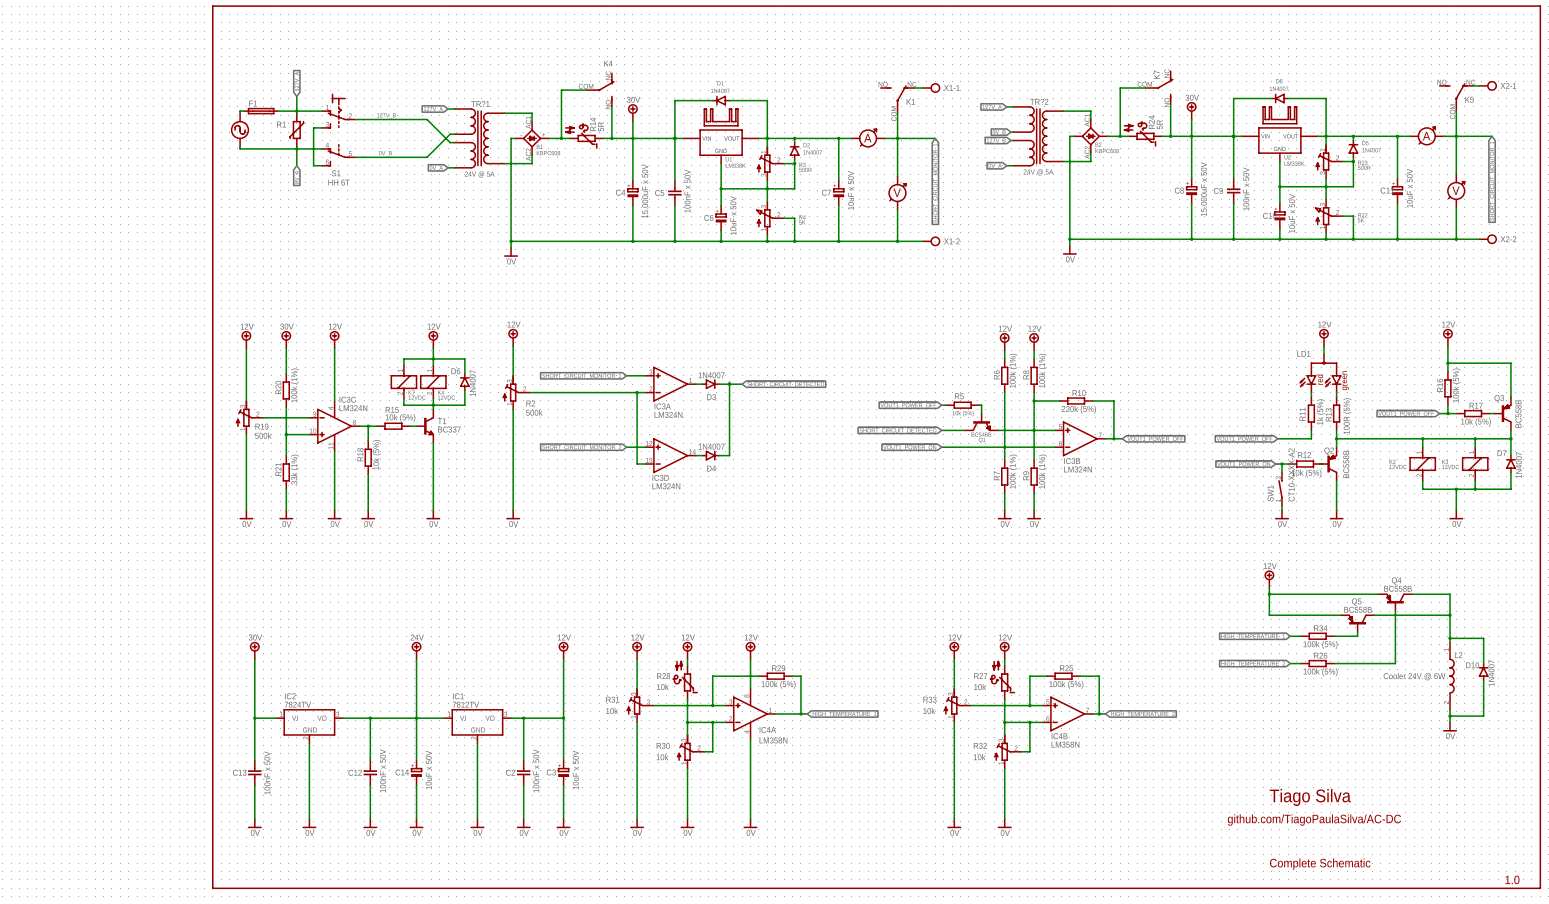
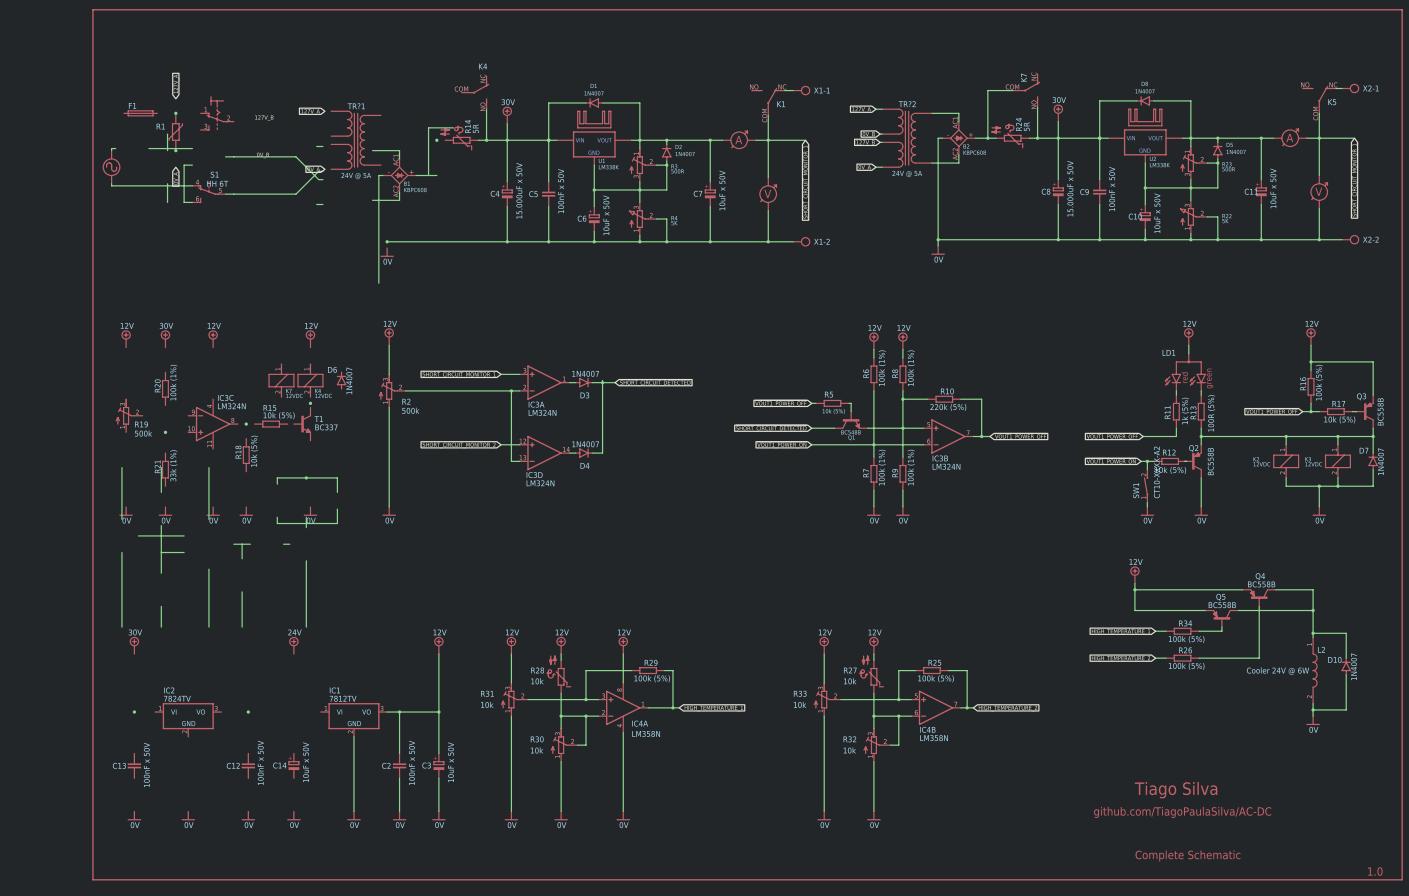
wire: (586, 90) (561, 90) (561, 138) -> (453, 127) (428, 127) (428, 175)
wire: (296, 96) (296, 113) -> (167, 134) (167, 150)
wire: (448, 109) (454, 109) -> (316, 146) (322, 146)
wire: (244, 111) (240, 111) (240, 113) -> (115, 148) (111, 148) (111, 150)
wire: (277, 111) (322, 111) -> (148, 148) (192, 148)
wire: (504, 113) (532, 113) (532, 121) -> (372, 150) (399, 150) (399, 158)
wire: (355, 119) (427, 119) (450, 142) (454, 142) -> (225, 156) (295, 156) (318, 179) (322, 179)
wire: (322, 127) (313, 127) (313, 165) (322, 165) -> (192, 165) (184, 165) (184, 202) (192, 202)
part position: (240, 130) -> (111, 167)
wire: (454, 134) (450, 134) (427, 157) (355, 157) -> (322, 171) (318, 171) (295, 194) (225, 194)
wire: (515, 138) (511, 138) (511, 247) -> (382, 175) (378, 175) (378, 283)
part position: (532, 138) -> (399, 175)
wire: (548, 138) (569, 138) -> (416, 175) (436, 175)
wire: (240, 146) (240, 148) (322, 148) -> (111, 183) (111, 185) (192, 185)
wire: (296, 146) (296, 165) -> (167, 183) (167, 202)
part position: (338, 155) -> (208, 192)
wire: (532, 155) (532, 163) (504, 163) -> (399, 192) (399, 200) (372, 200)
wire: (448, 167) (454, 167) -> (316, 204) (322, 204)
wire: (246, 348) (246, 400) -> none
wire: (286, 348) (286, 373) -> none
wire: (334, 348) (334, 400) -> none
wire: (433, 348) (433, 365) -> none
wire: (403, 365) (403, 358) (464, 358) (464, 373) -> none
wire: (464, 390) (464, 405) (403, 405) (403, 398) -> none
wire: (433, 398) (433, 409) -> none
wire: (286, 407) (286, 455) -> none
wire: (263, 417) (309, 417) -> none
wire: (359, 426) (376, 426) -> none
wire: (368, 426) (368, 440) -> none
wire: (410, 426) (416, 426) -> none
wire: (246, 434) (246, 510) -> none
wire: (286, 434) (309, 434) -> none
wire: (433, 443) (433, 510) -> none
wire: (334, 451) (334, 510) -> none
wire: none -> (121, 467) (121, 519)
wire: none -> (161, 467) (161, 492)
wire: none -> (208, 467) (208, 519)
wire: (368, 474) (368, 510) -> none
junction: none -> (306, 477)
wire: none -> (277, 484) (277, 477) (337, 477) (337, 492)
wire: (286, 489) (286, 510) -> none
wire: none -> (337, 509) (337, 523) (277, 523) (277, 517)
wire: none -> (306, 517) (306, 527)
wire: none -> (161, 525) (161, 573)
wire: none -> (138, 535) (184, 535)
wire: none -> (233, 544) (250, 544)
wire: none -> (242, 544) (242, 558)
wire: none -> (283, 544) (289, 544)
wire: none -> (121, 552) (121, 627)
wire: none -> (161, 552) (184, 552)
wire: none -> (306, 560) (306, 627)
wire: none -> (208, 569) (208, 627)
wire: none -> (242, 591) (242, 627)
wire: none -> (161, 606) (161, 627)
wire: (254, 659) (254, 760) -> none
wire: (416, 659) (416, 760) -> none
wire: (254, 718) (275, 718) -> none
wire: (343, 718) (443, 718) -> none
wire: (370, 718) (370, 760) -> none
wire: (309, 743) (309, 819) -> none
wire: (254, 785) (254, 819) -> none
wire: (370, 785) (370, 819) -> none
wire: (416, 785) (416, 819) -> none

